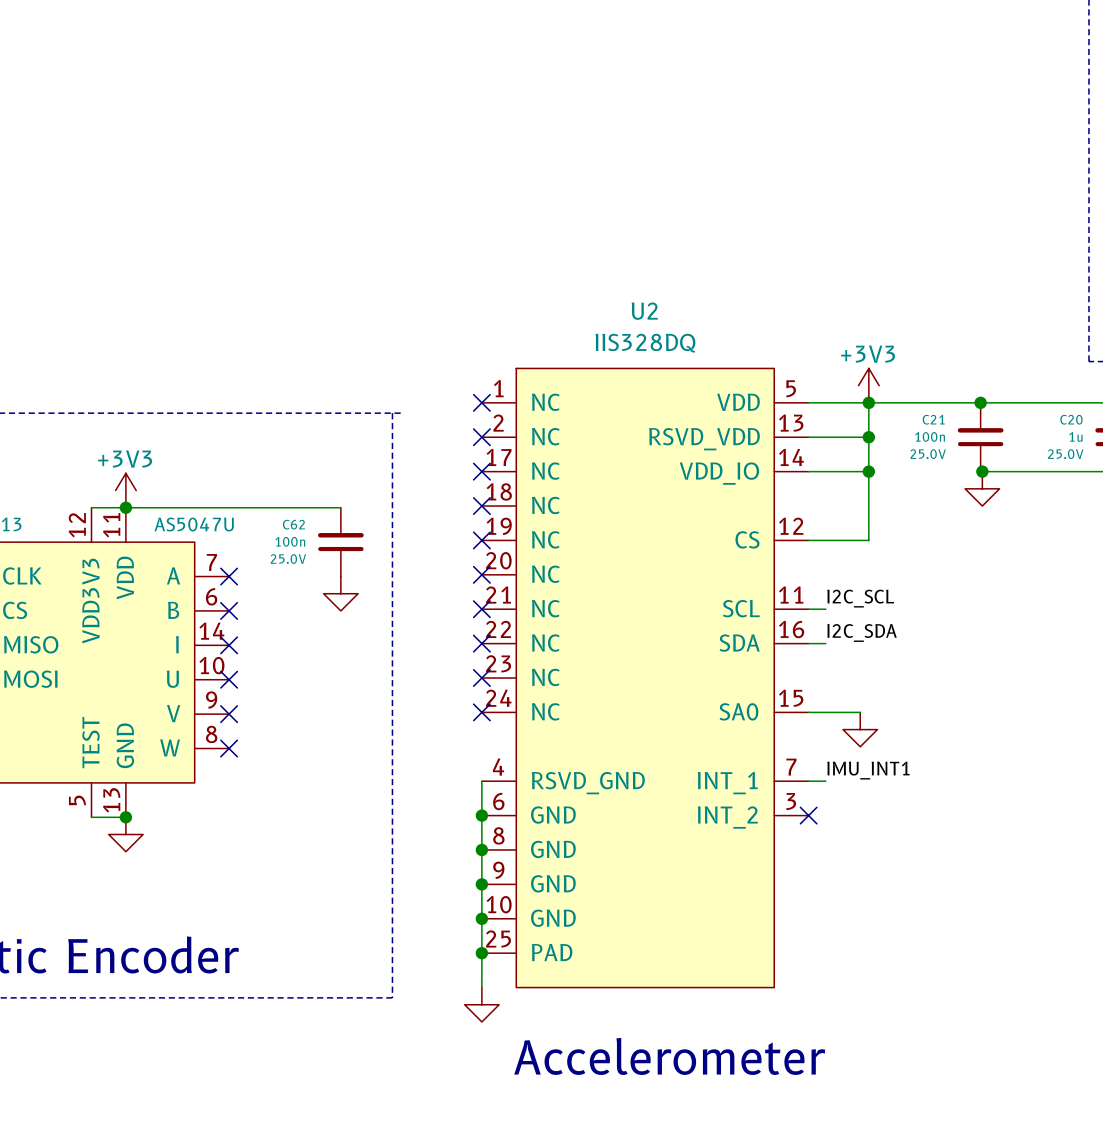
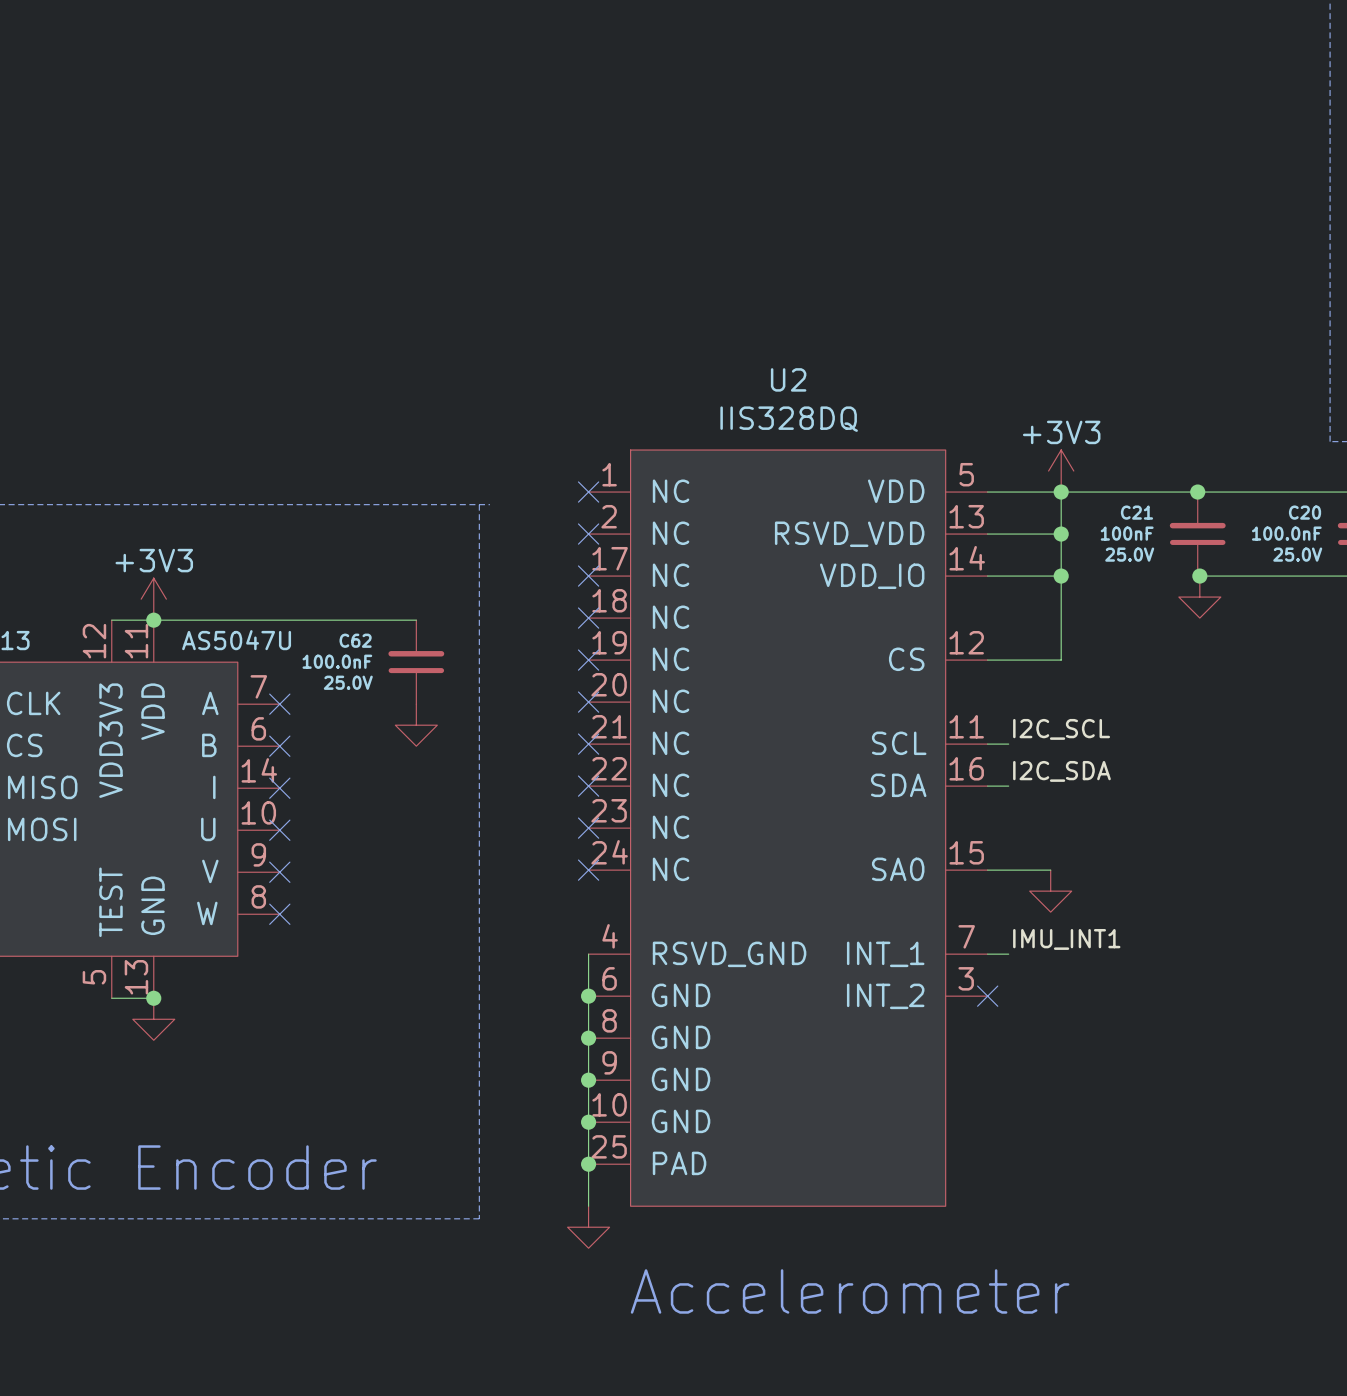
C21 value: 100n (930, 436) -> 100nF (1127, 533)
C20 value: 1u (1075, 436) -> 100.0nF (1286, 533)
C62 value: 100n (290, 541) -> 100.0nF (337, 661)

